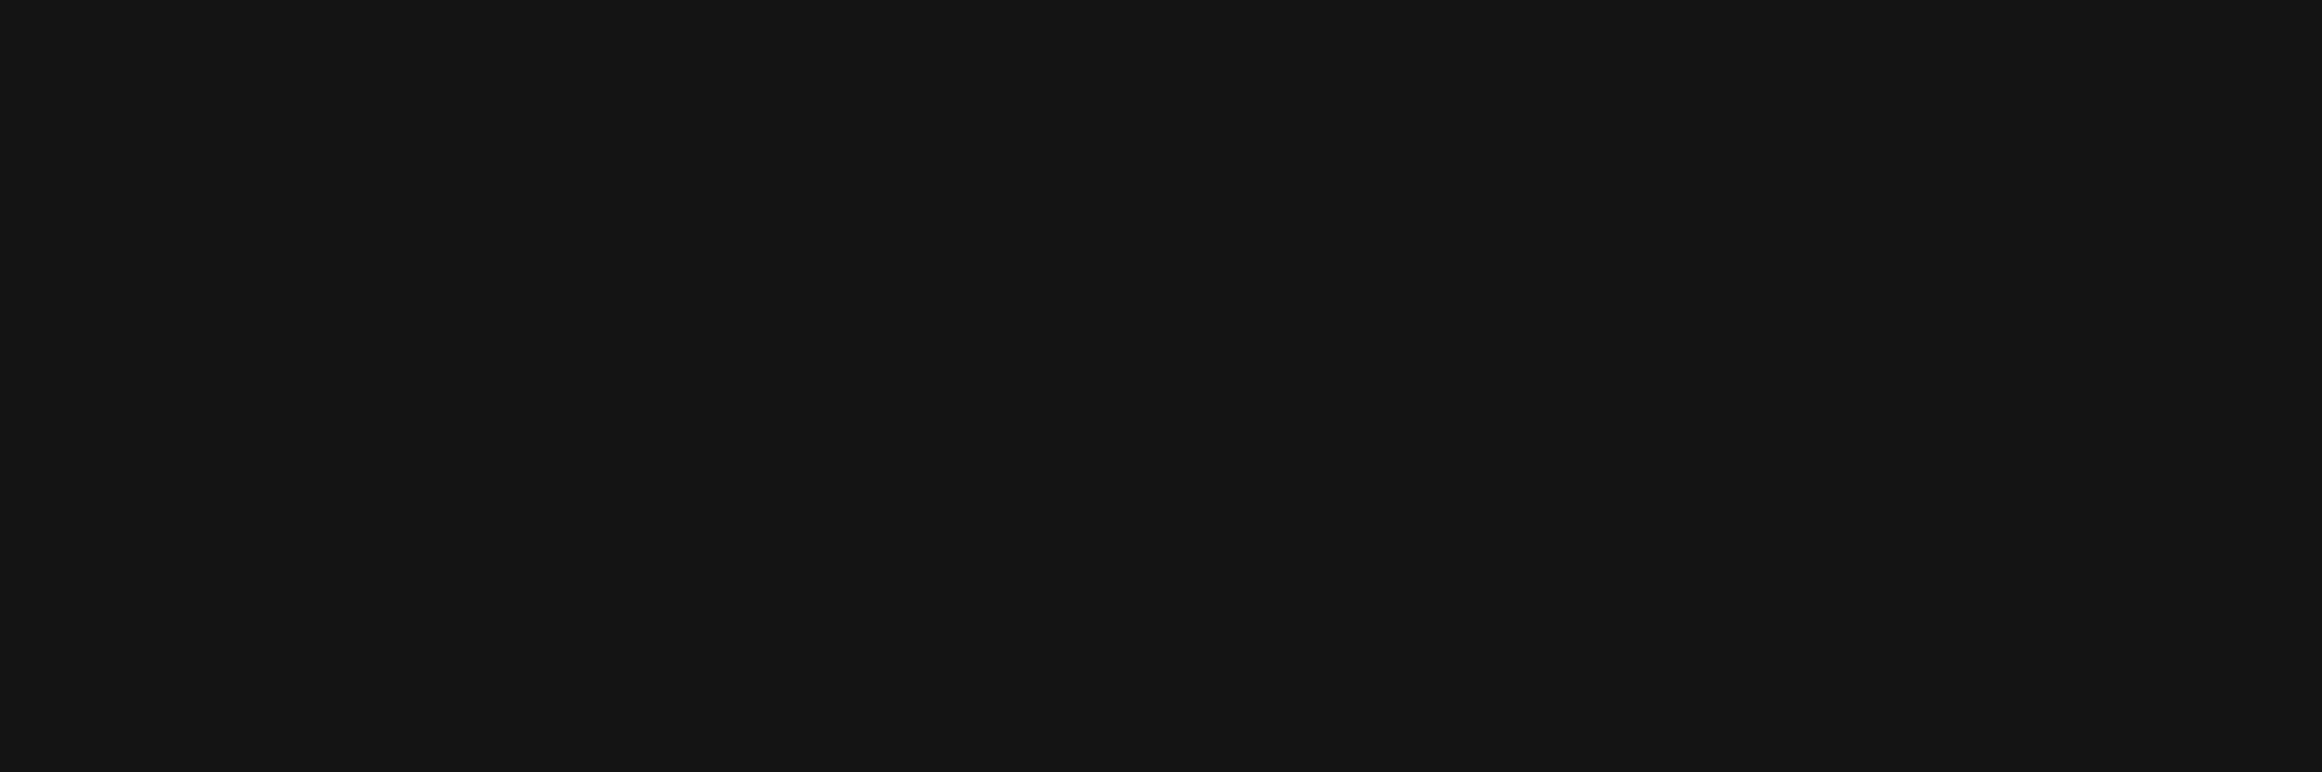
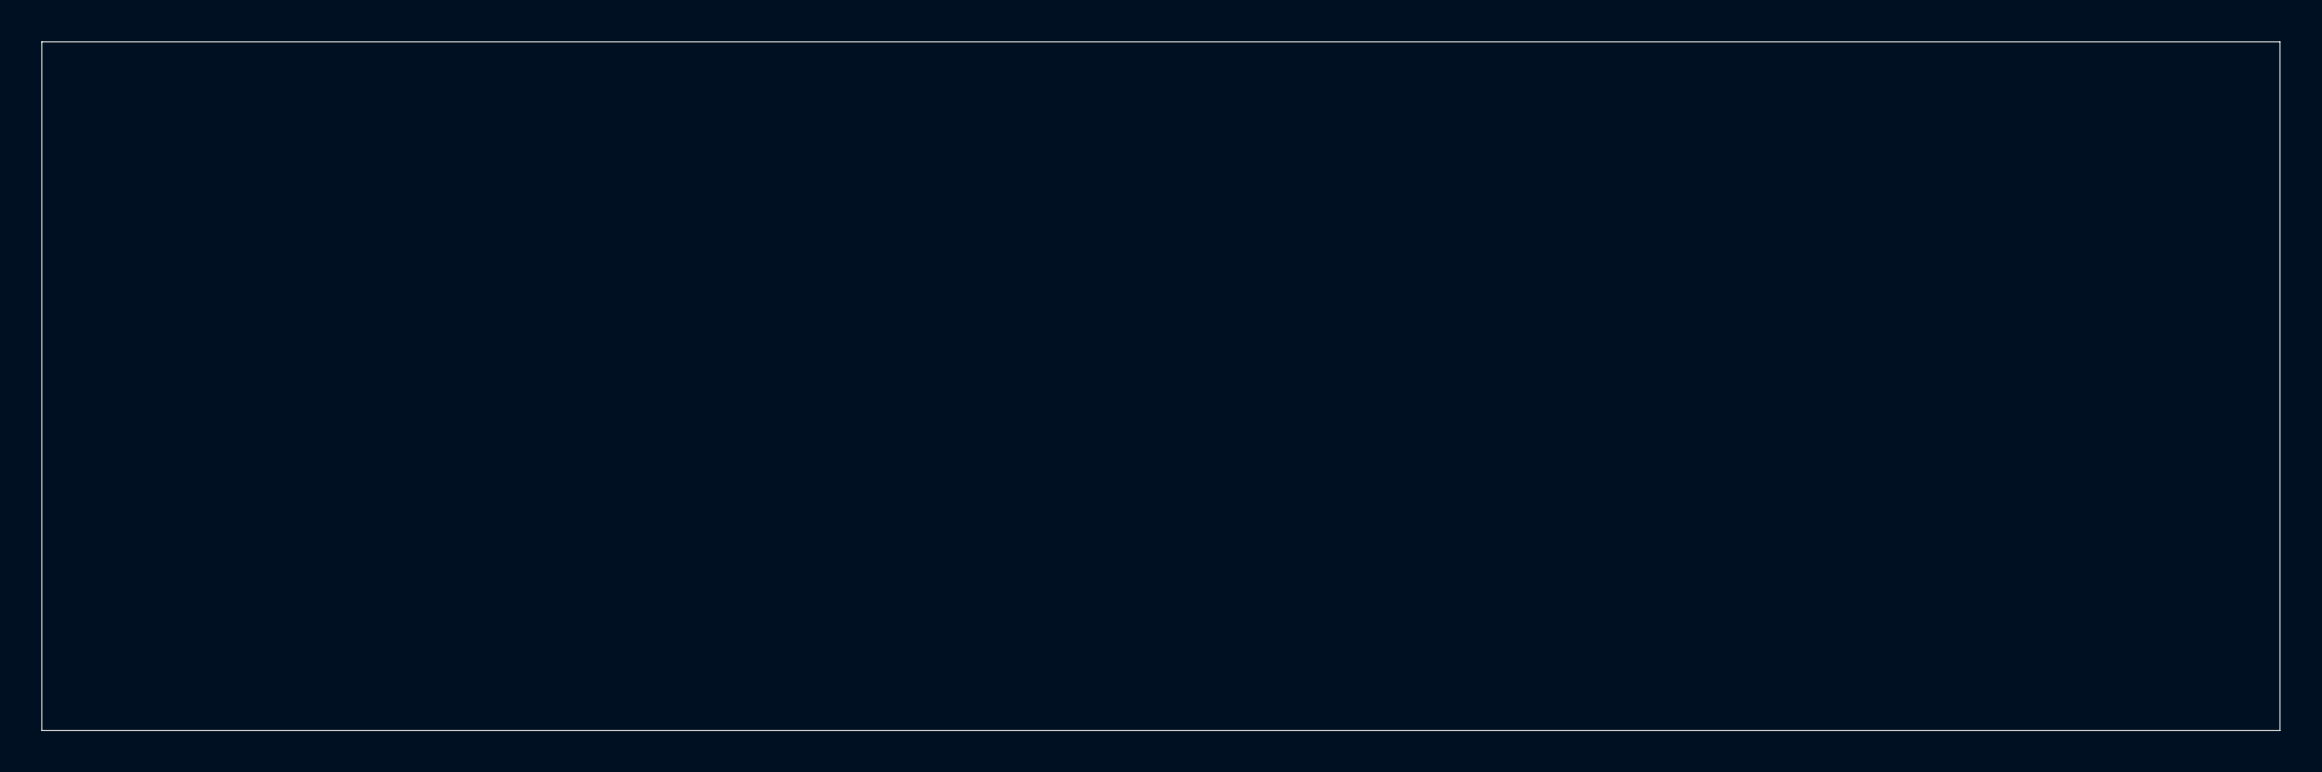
board edge: none -> (41, 41) (2279, 41) (2279, 730) (41, 730) (41, 41)

